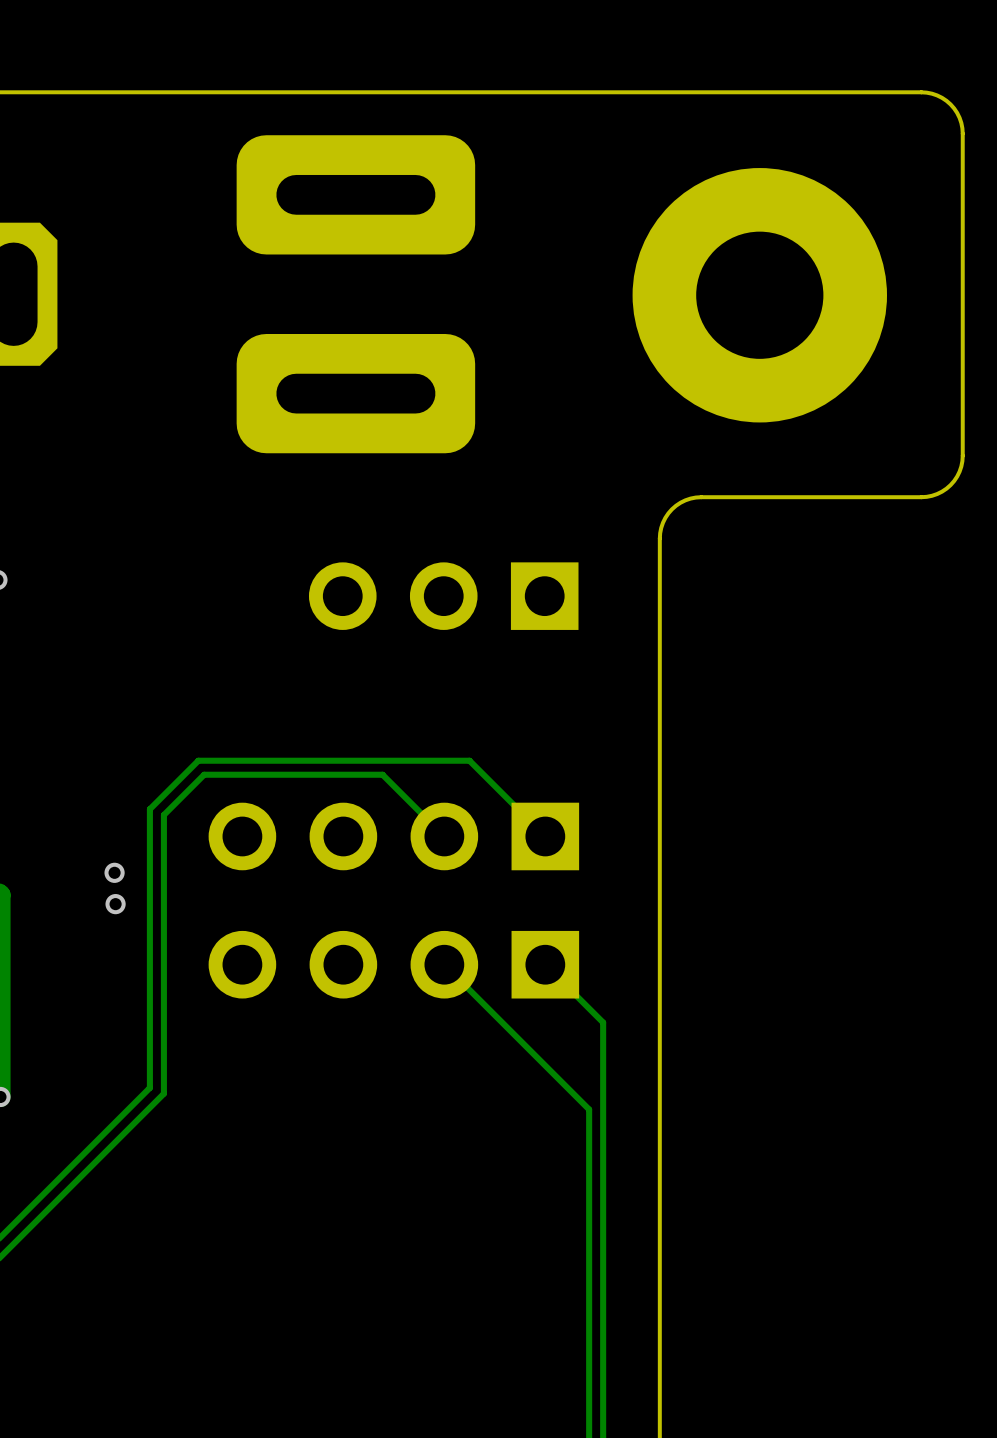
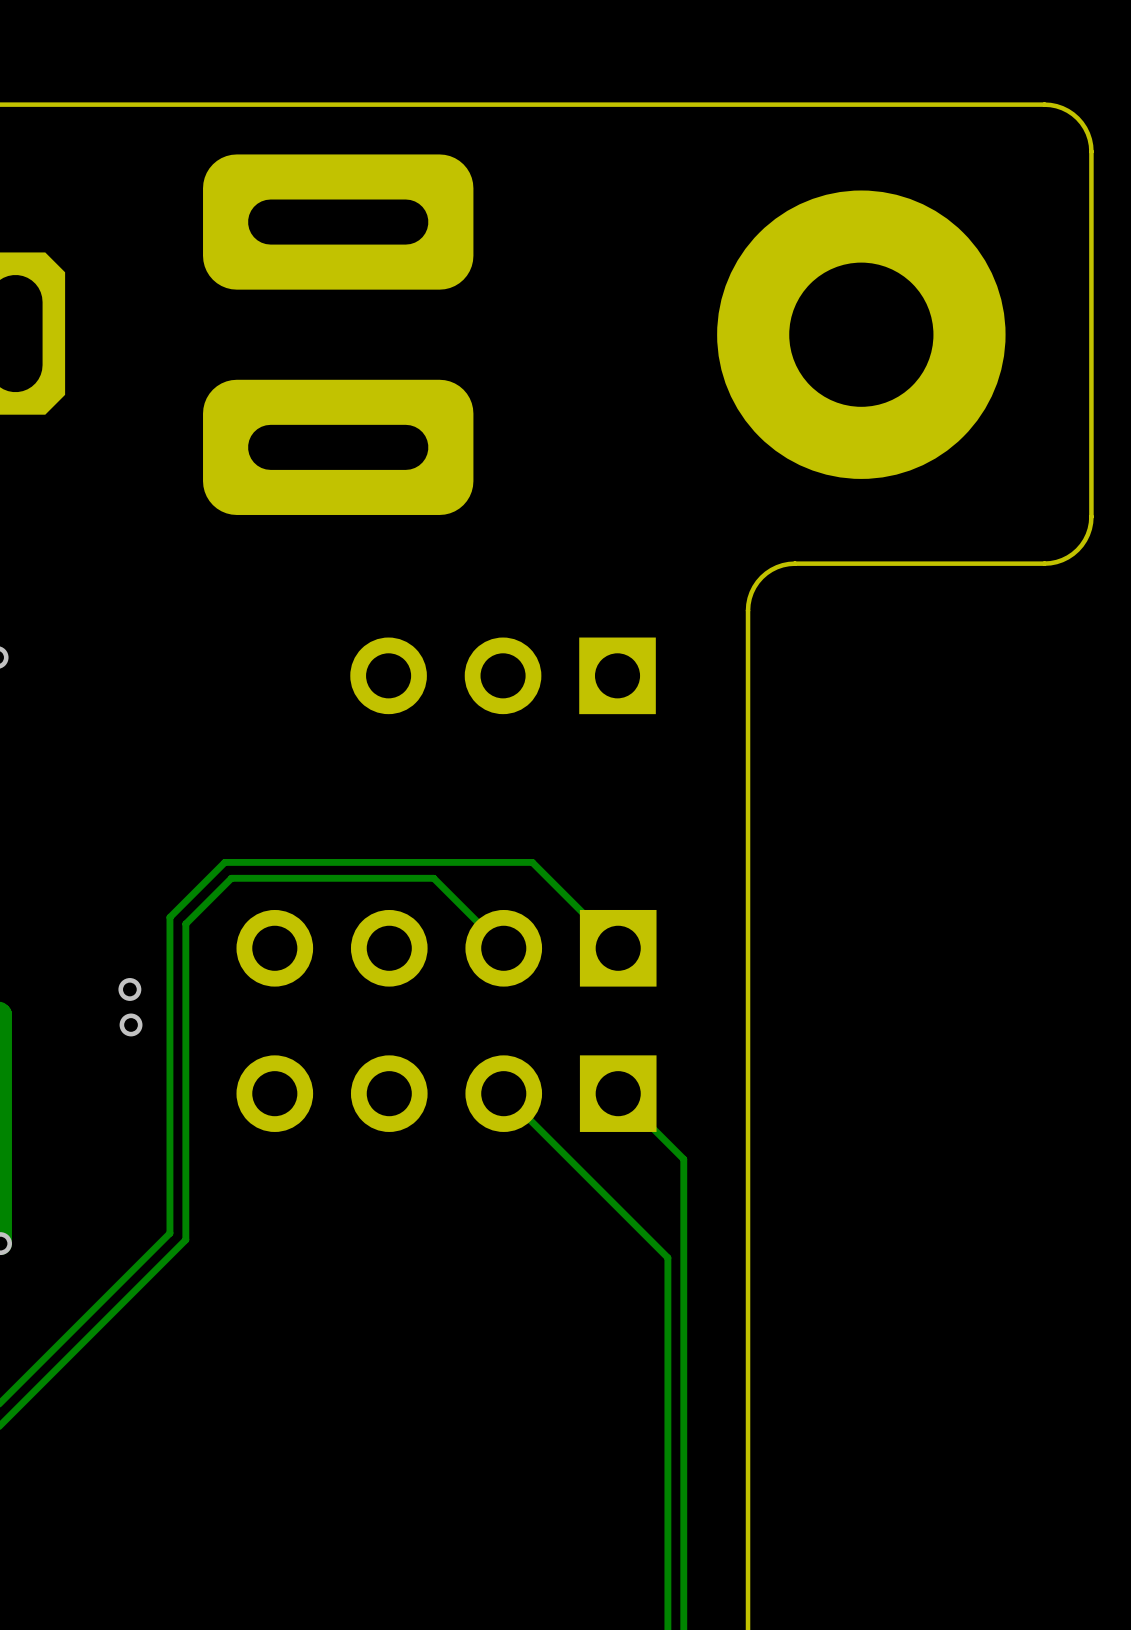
part position: (355, 294) -> (338, 334)

